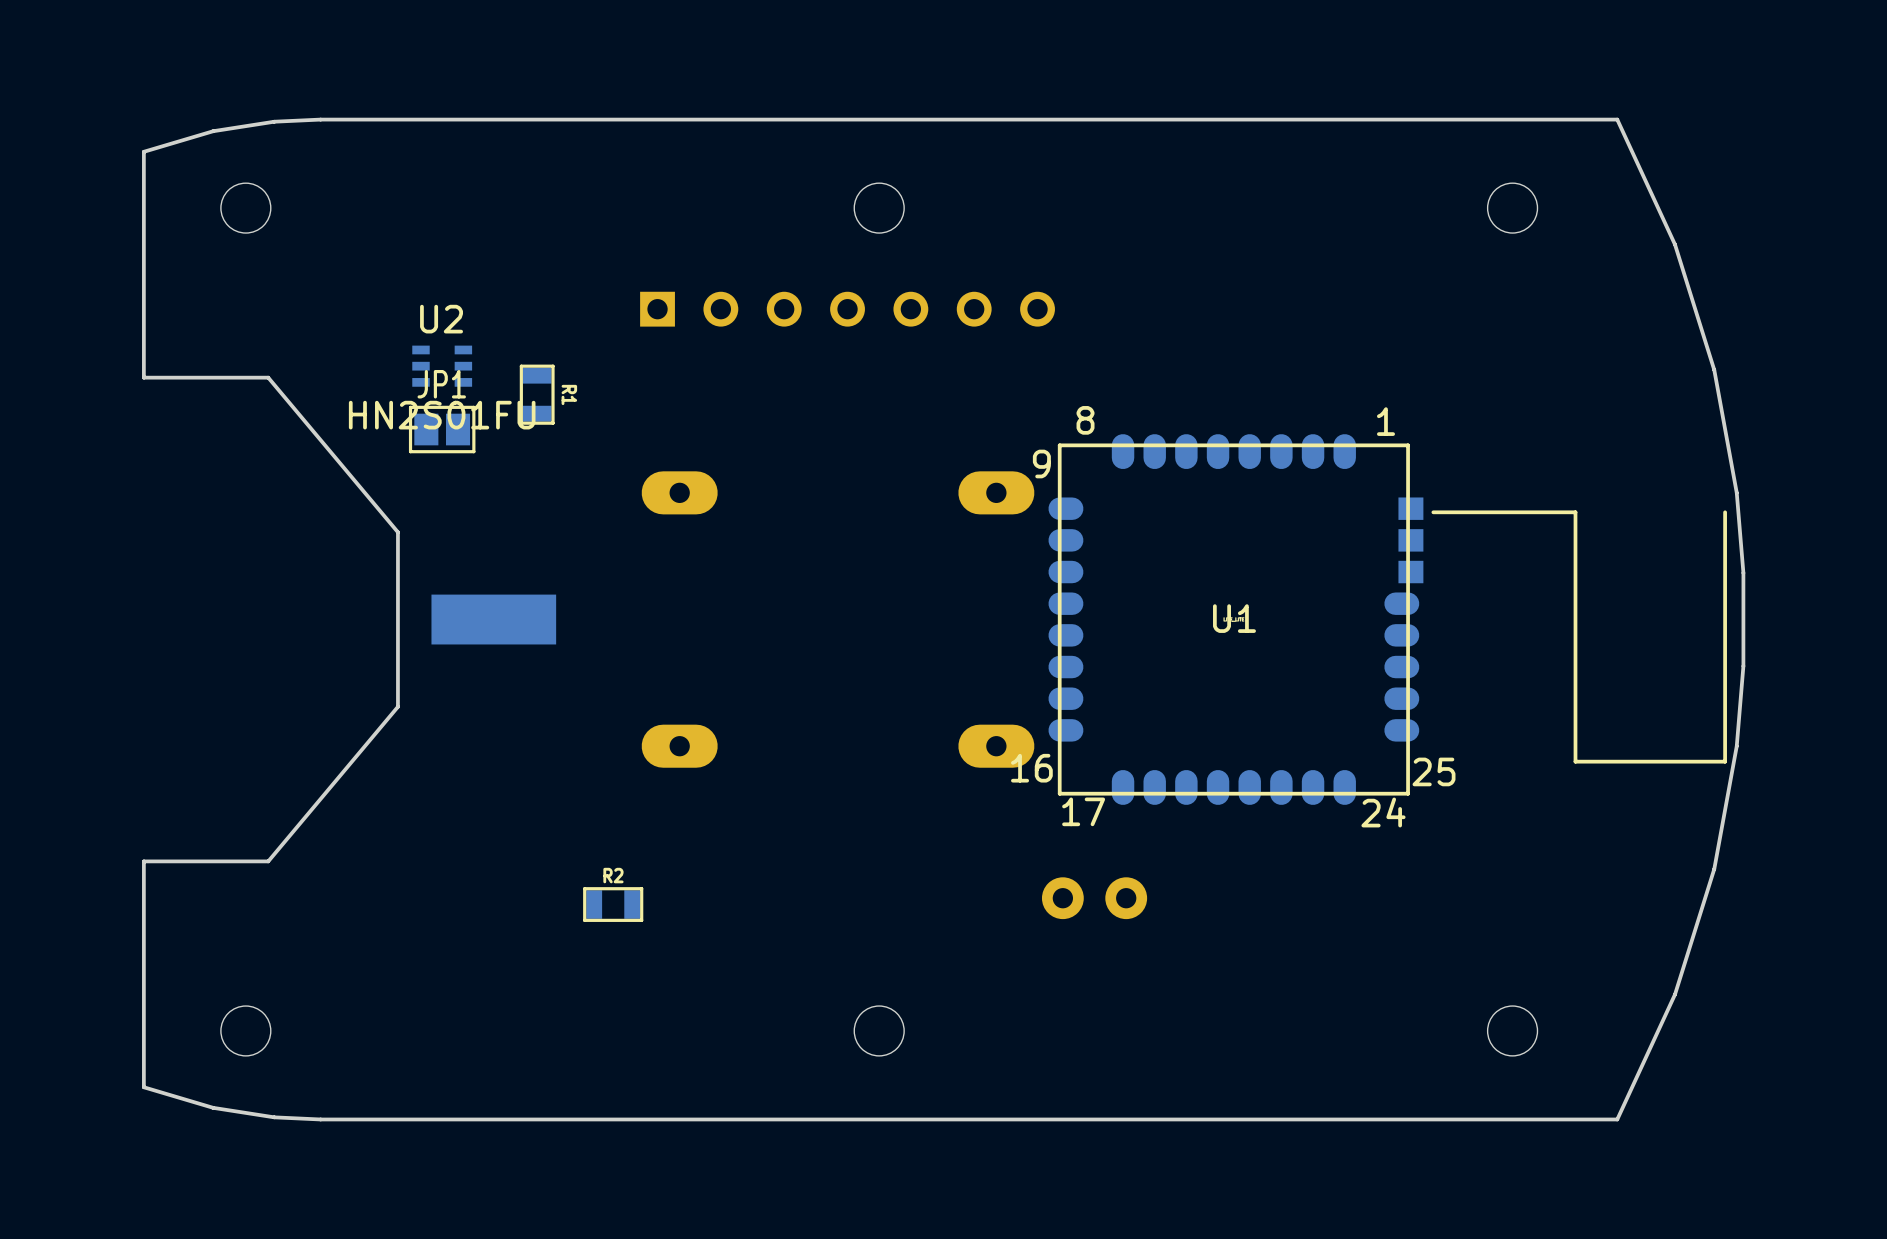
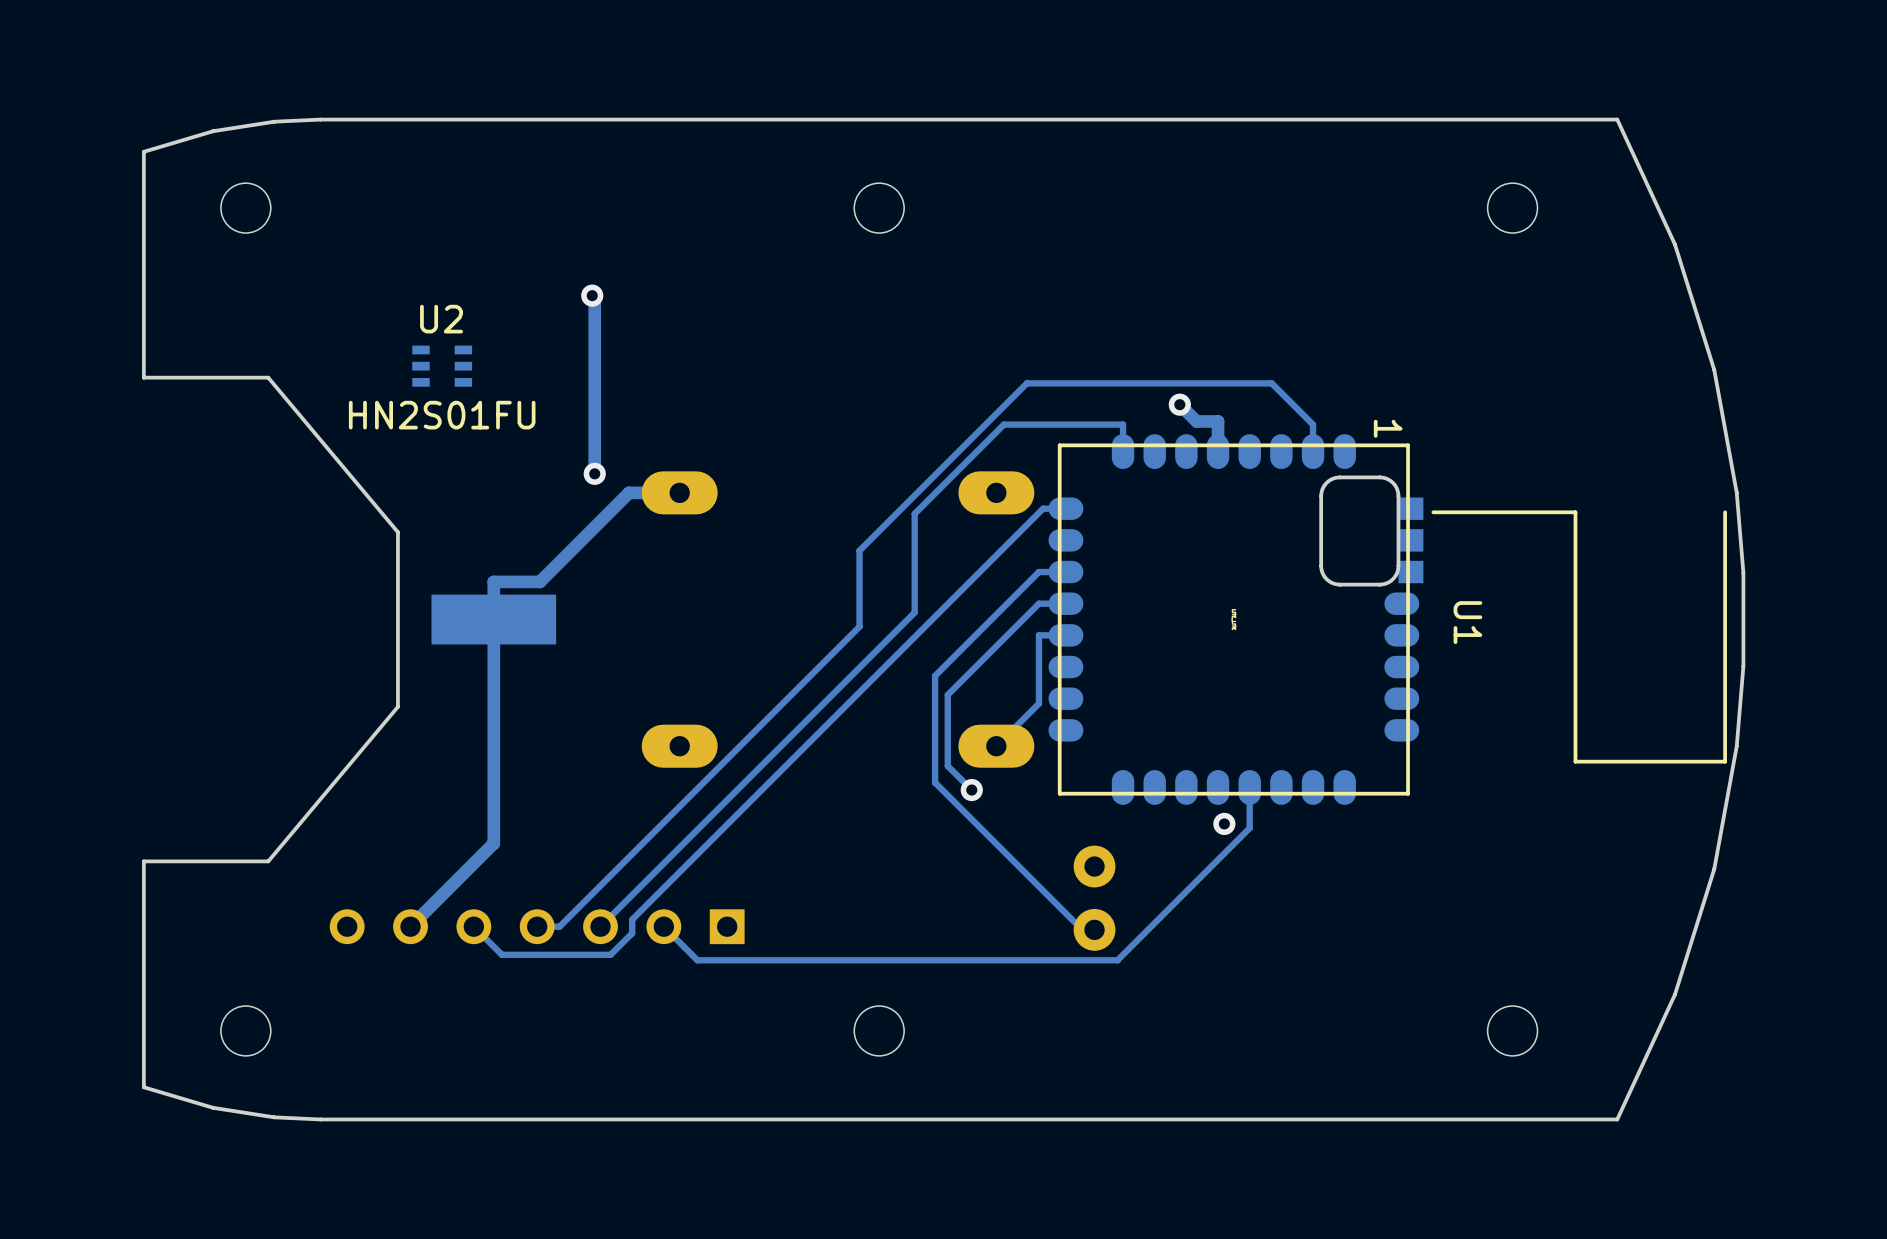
track: none -> (592, 295) (594, 298) (594, 473)
via: none -> (592, 295)
part: (847, 309) -> none
R1: (537, 394) -> none
track: none -> (1179, 404) (1196, 421) (1218, 421) (1218, 451)
via: none -> (1179, 404)
JP1: (442, 429) -> none
U1 footprint: [1048, 434, 1727, 805] -> [1048, 434, 1727, 805]
track: none -> (1123, 451) (1123, 424) (1003, 424) (914, 513) (914, 612) (600, 926)
track: none -> (1313, 451) (1313, 424) (1271, 383) (1026, 383) (859, 550) (859, 626) (559, 926) (537, 926)
via: none -> (594, 473)
track: none -> (679, 492) (629, 492) (539, 581) (493, 581) (493, 843) (410, 926)
track: none -> (1065, 508) (1043, 508) (632, 919) (632, 933) (610, 954) (501, 954) (473, 926)
track: none -> (1065, 572) (1038, 572) (935, 675) (935, 782) (1082, 929) (1094, 929)
track: none -> (1065, 603) (1038, 603) (947, 694) (947, 766) (971, 790)
U1 name position: U1 (1234, 618) -> U1 (1467, 622)
track: none -> (1065, 635) (1038, 635) (1038, 703) (996, 746)
track: none -> (1249, 787) (1249, 828) (1117, 960) (697, 960) (663, 926)
via: none -> (971, 790)
via: none -> (1224, 823)
part rotation: 0° (1094, 898) -> 90° clockwise (1094, 898)
R2: (613, 904) -> none
part: none -> (537, 926)

